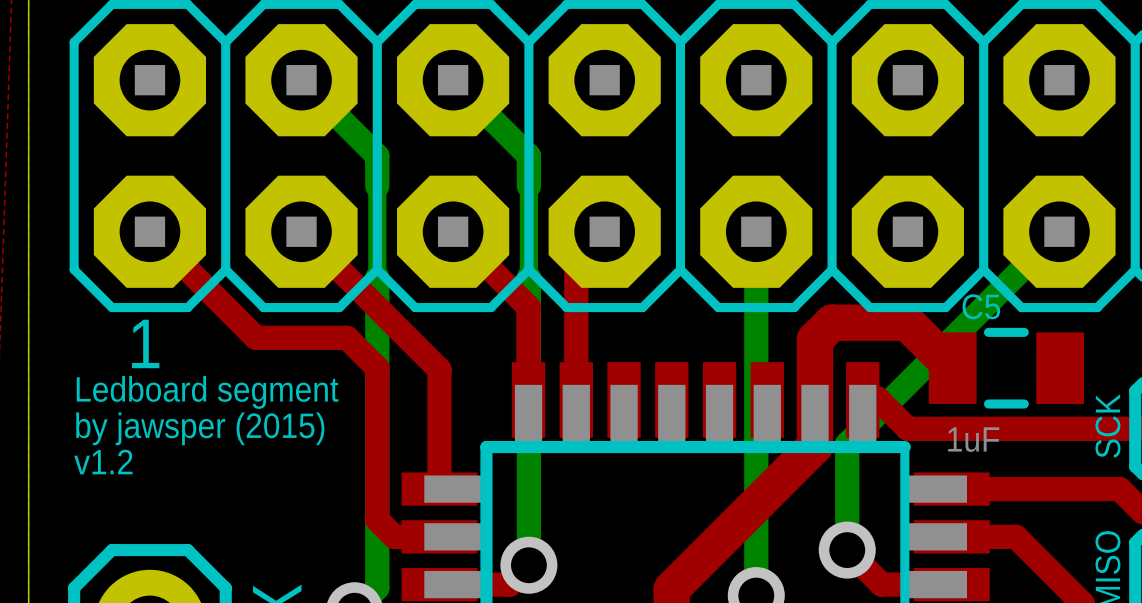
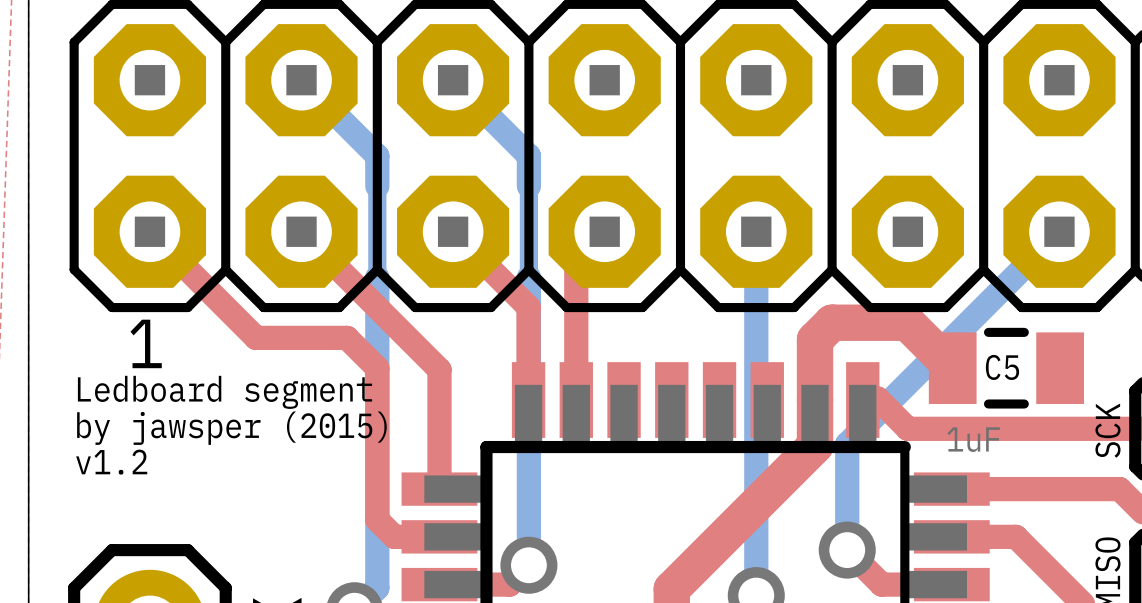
C5 name position: C5 (981, 306) -> C5 (1002, 367)

